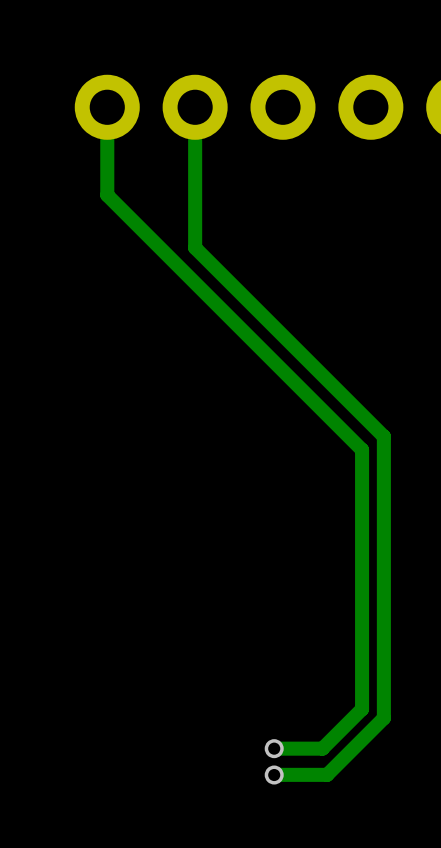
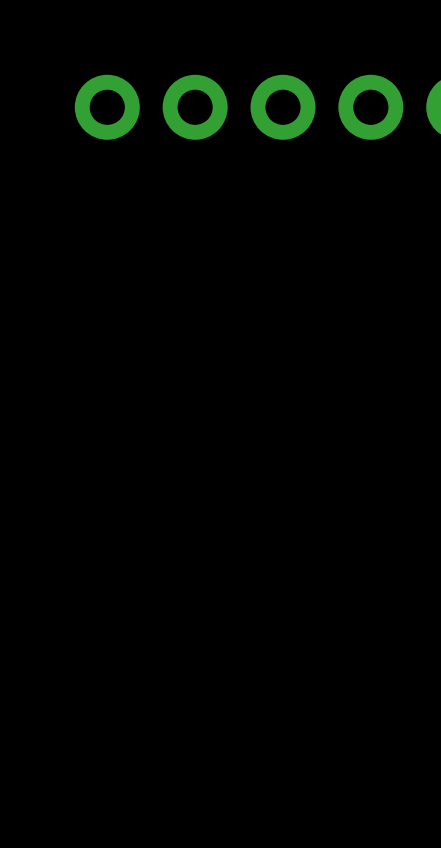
track: (107, 107) (107, 195) (362, 449) (362, 709) (322, 748) (274, 748) -> none
track: (195, 107) (195, 247) (383, 436) (383, 718) (327, 774) (274, 774) -> none
via: (274, 748) -> none
via: (274, 775) -> none

